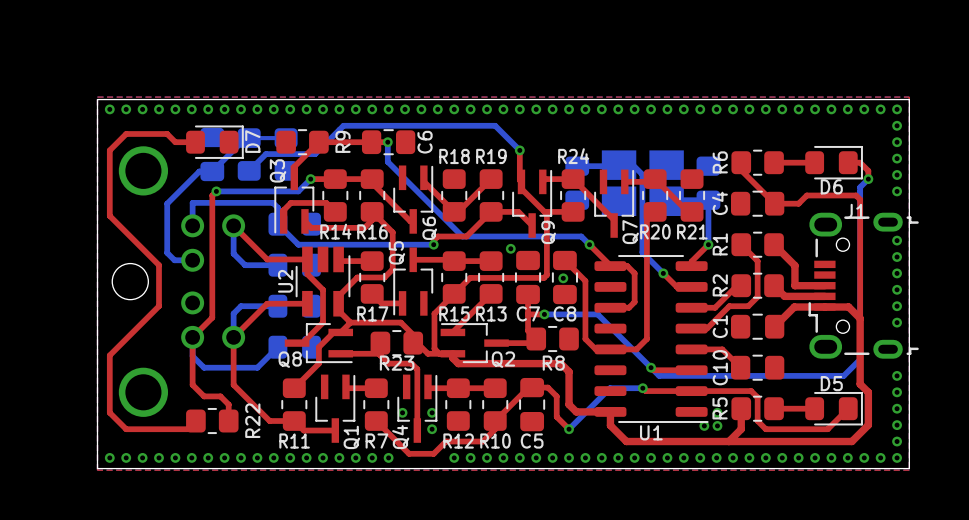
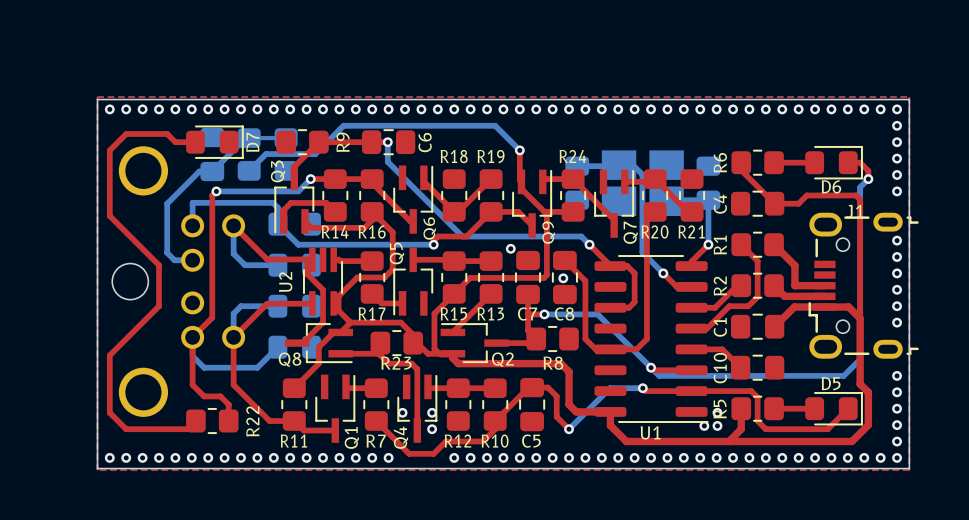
U2 footprint: [295, 246, 351, 317] -> [303, 247, 344, 316]

